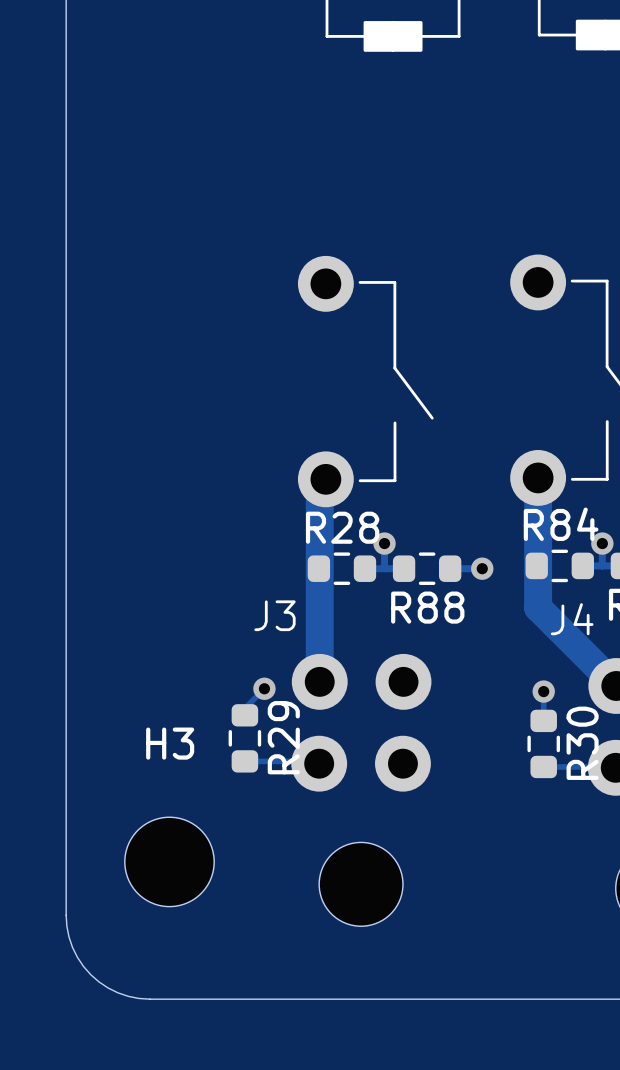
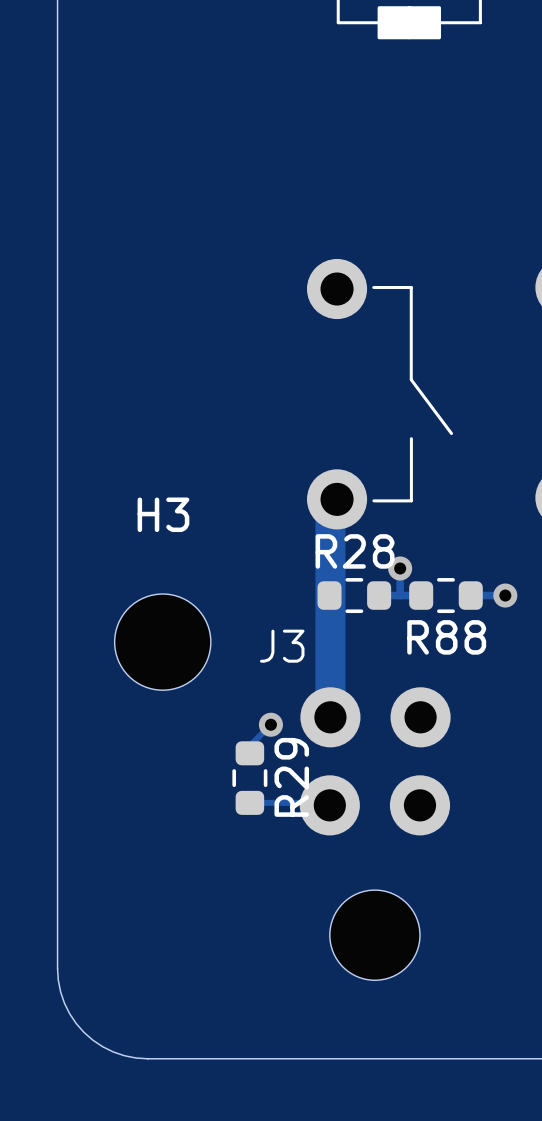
H3 position: (169, 861) -> (162, 642)

